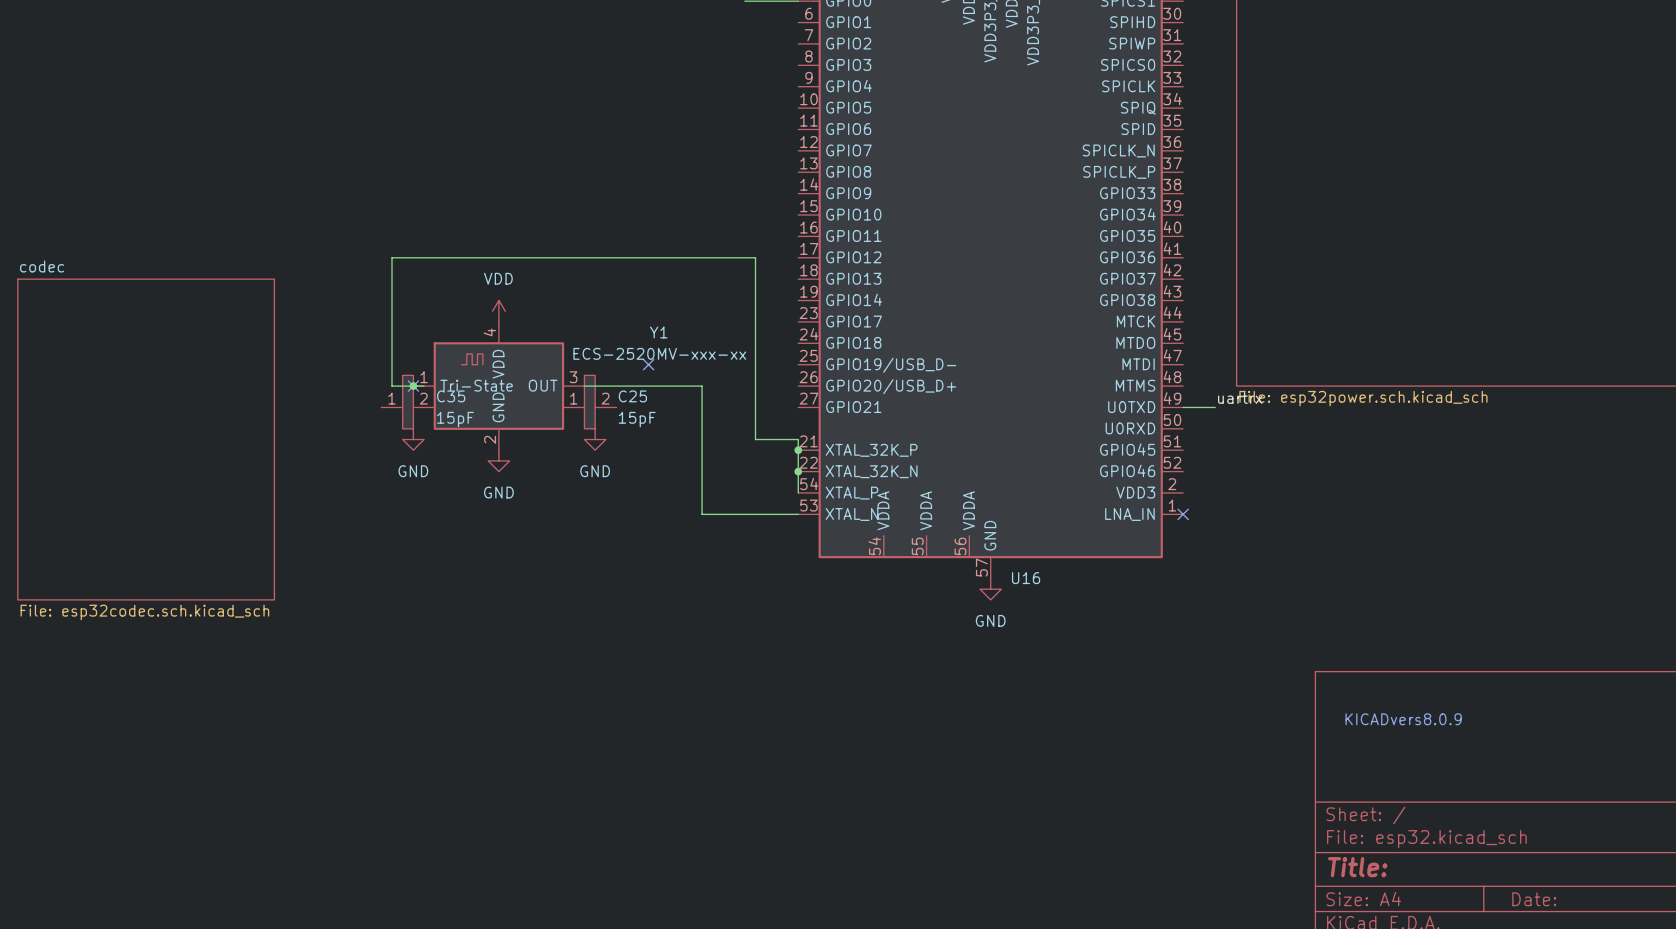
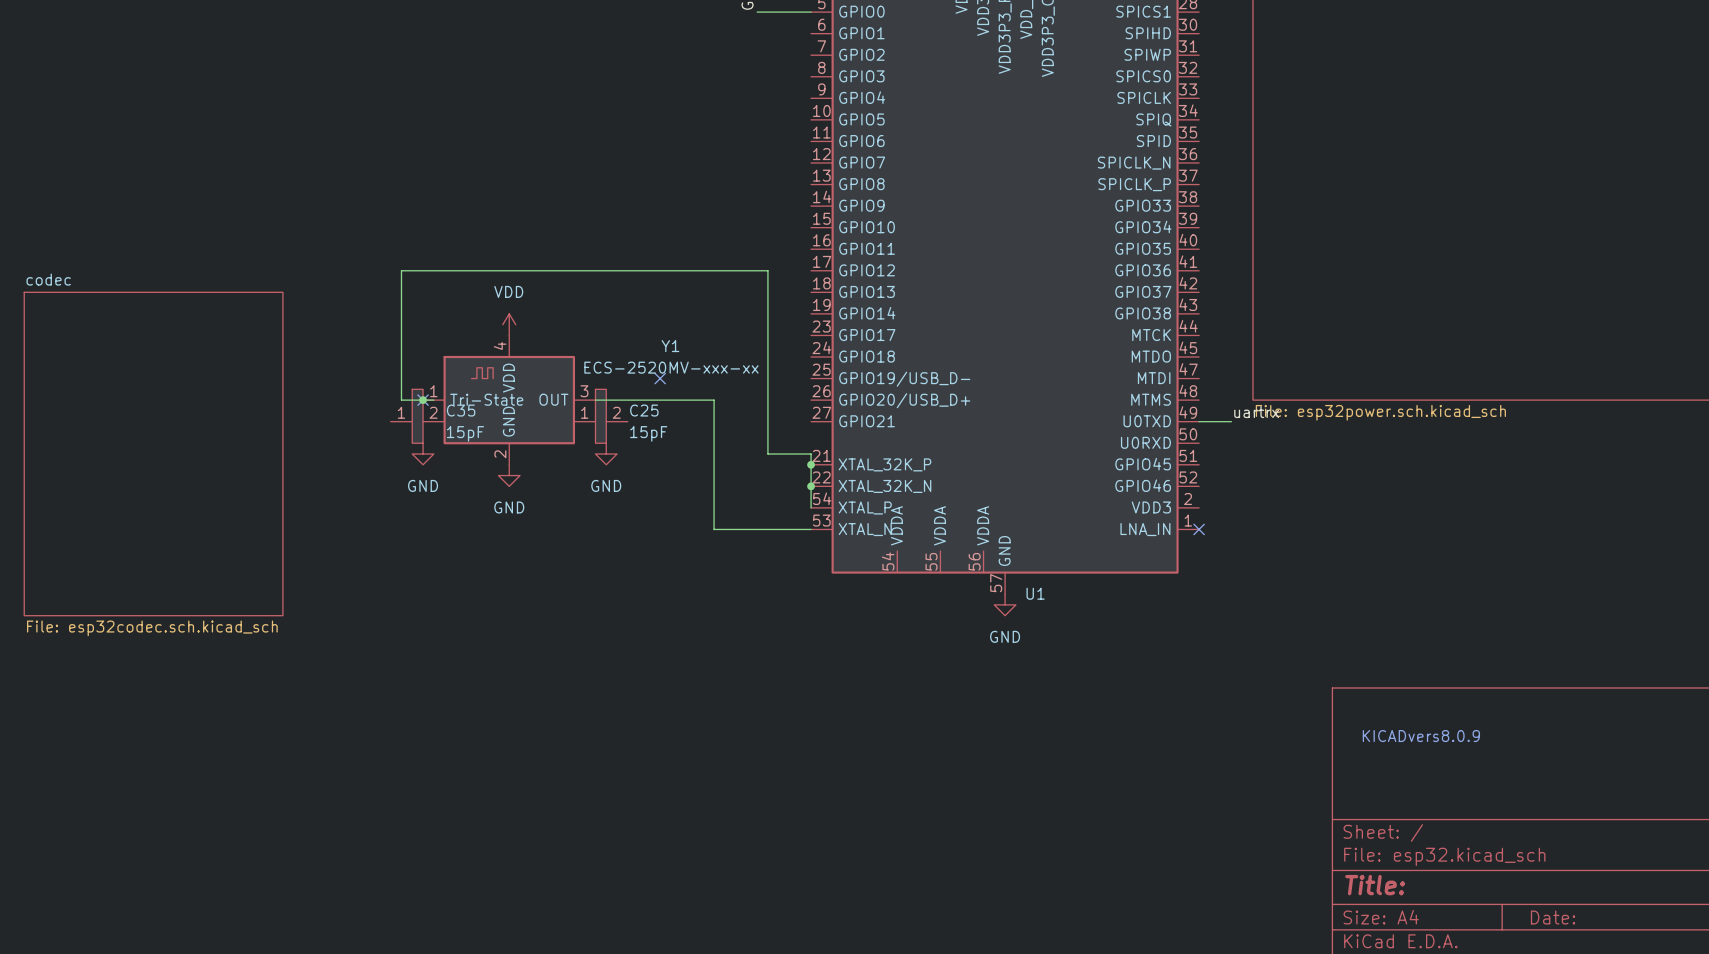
U16 name: U16 (1026, 578) -> U1 (1035, 593)

